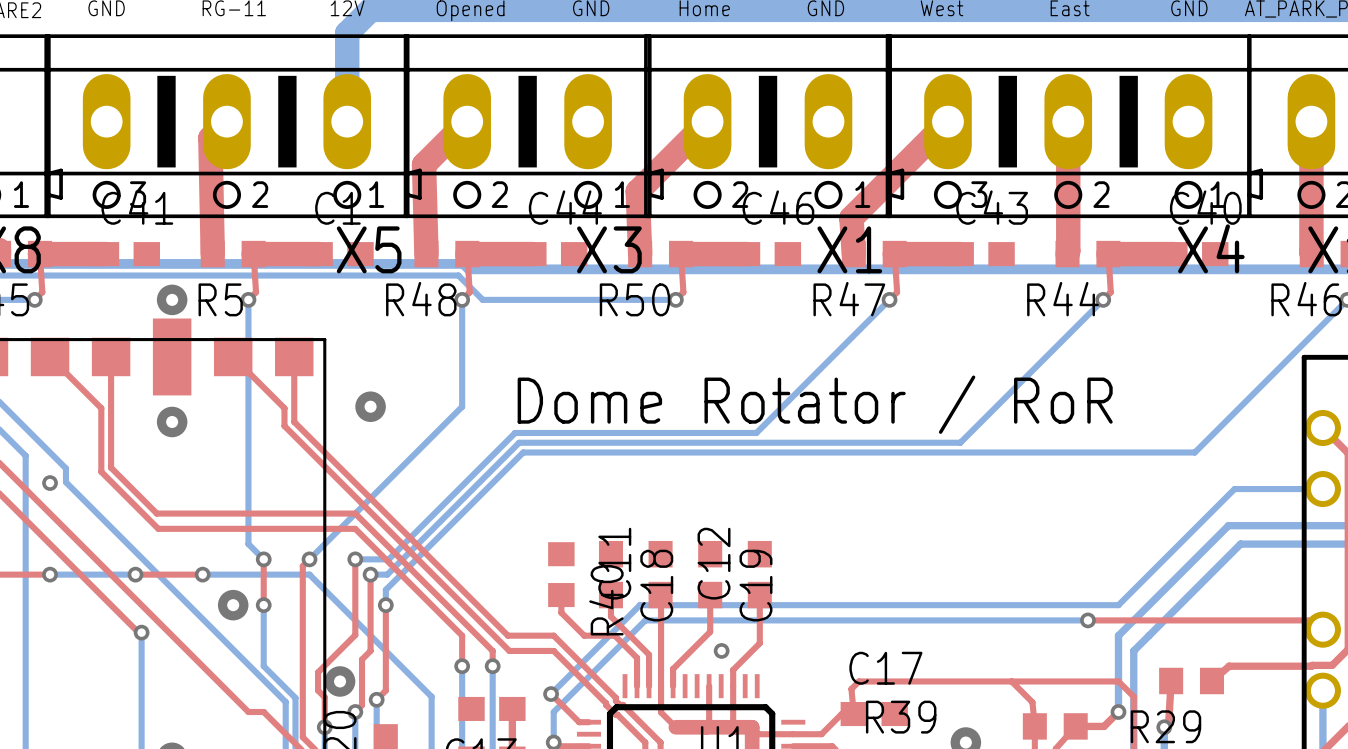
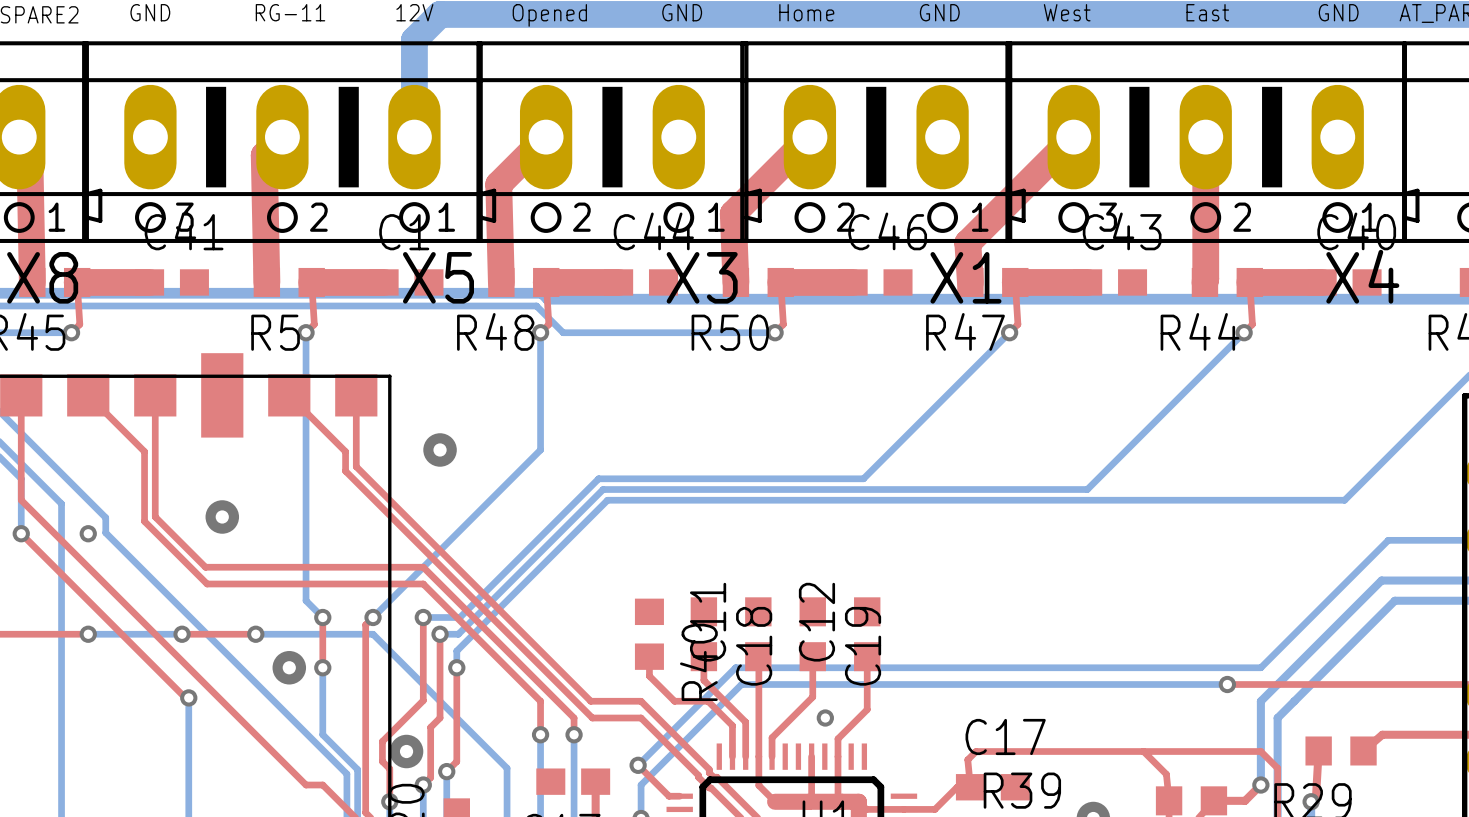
via: (172, 299) -> none
text: Dome Rotator / RoR (815, 404) -> none
via position: (172, 421) -> (222, 516)

